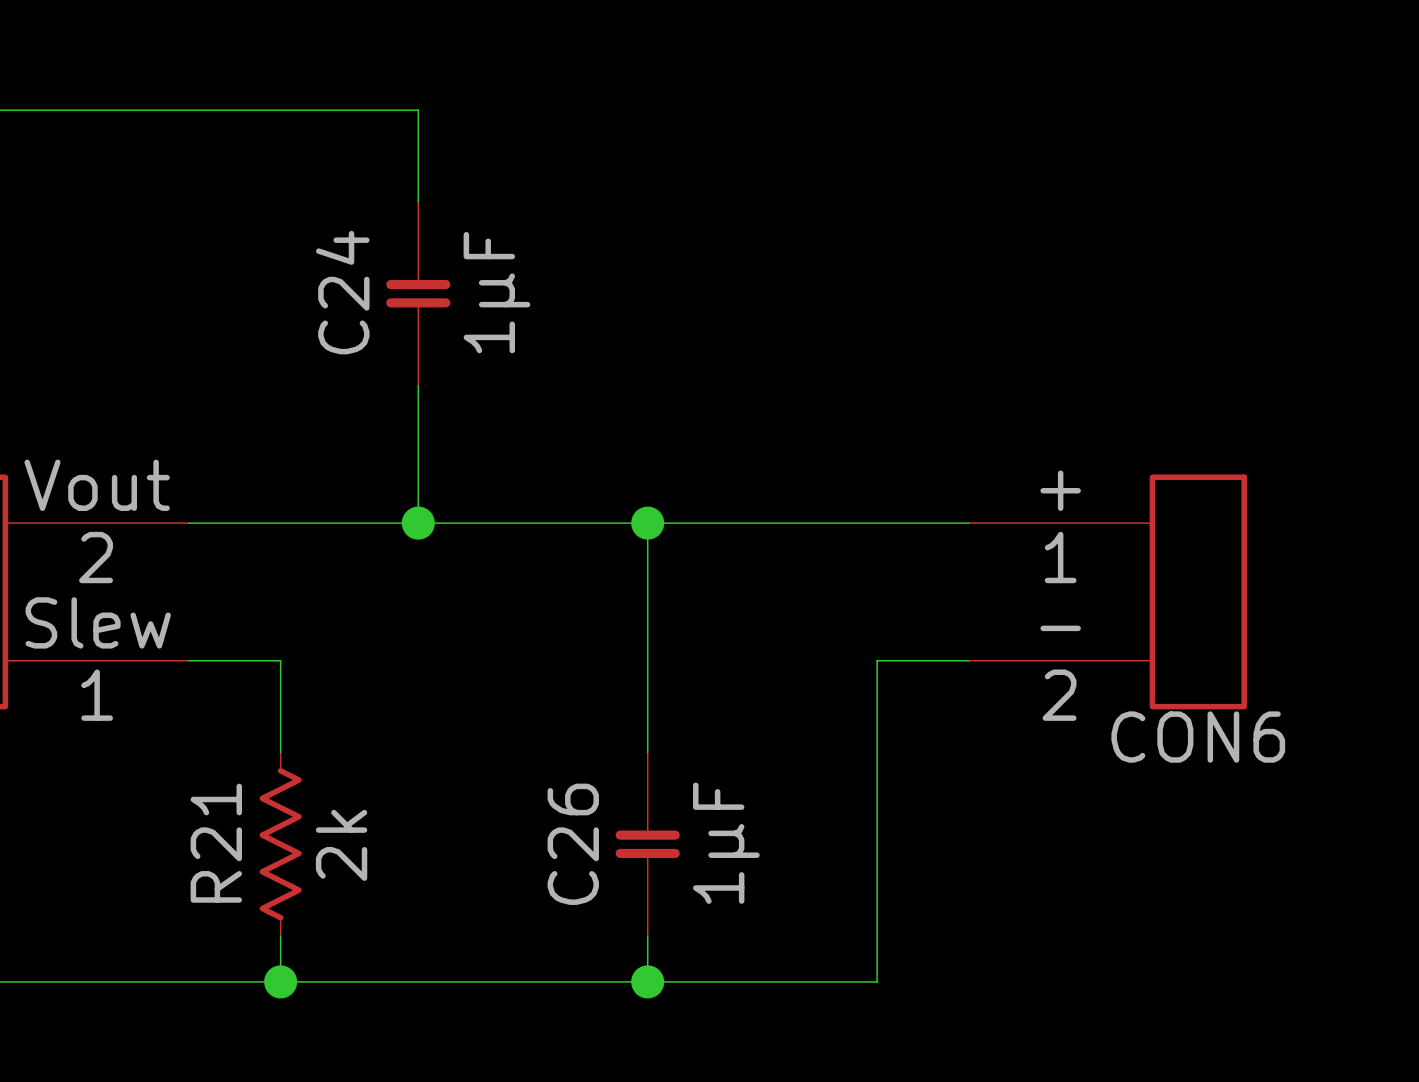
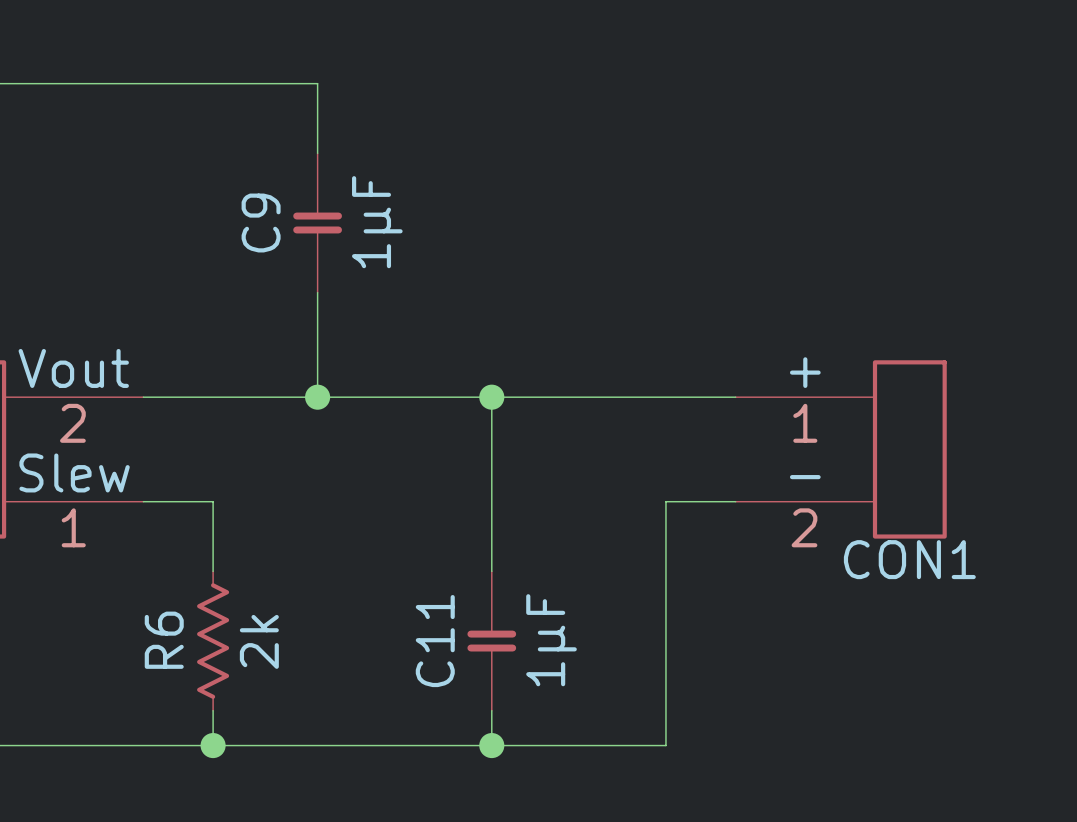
C24 name: C24 (342, 292) -> C9 (261, 223)
CON6 name: CON6 (1198, 737) -> CON1 (909, 559)
R21 name: R21 (216, 843) -> R6 (164, 640)
C26 name: C26 (573, 844) -> C11 (435, 641)

